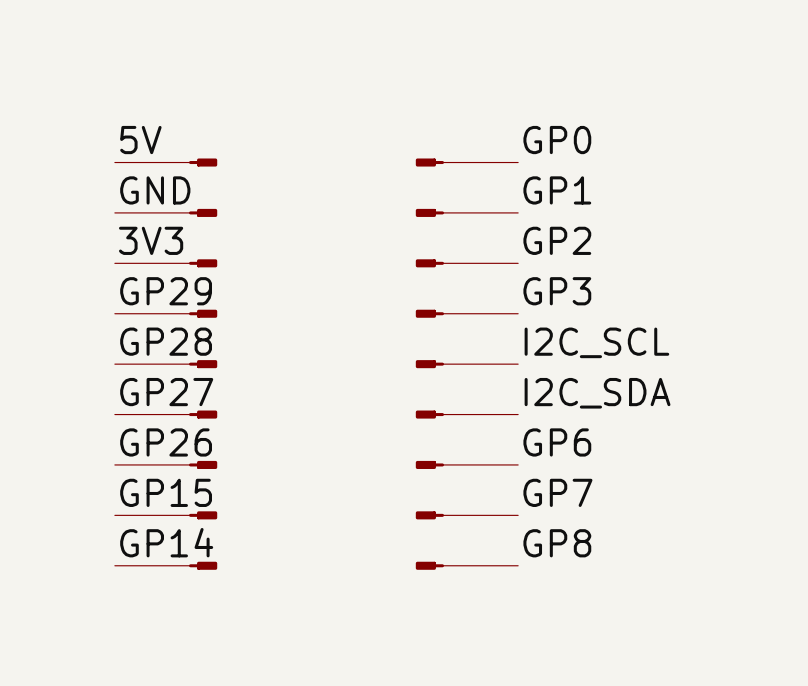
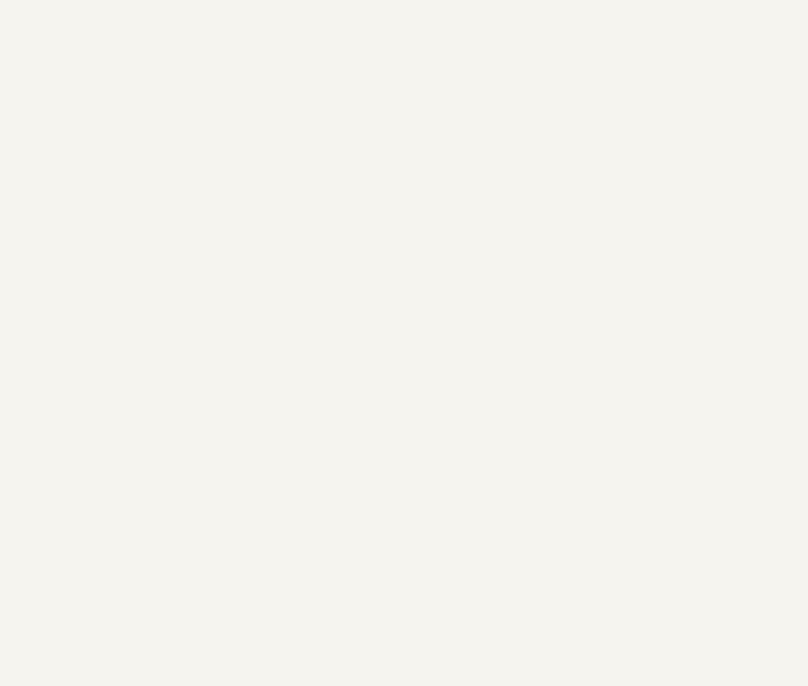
label: 5V (140, 140) -> none
label: GP0 (557, 140) -> none
label: GND (155, 190) -> none
label: GP1 (557, 190) -> none
label: 3V3 (151, 240) -> none
label: GP2 (557, 240) -> none
label: GP29 (166, 291) -> none
label: GP3 (557, 291) -> none
label: GP28 (166, 341) -> none
label: I2C_SCL (596, 342) -> none
part: (166, 364) -> none
part: (466, 364) -> none
label: GP27 (166, 392) -> none
label: I2C_SDA (597, 393) -> none
label: GP26 (166, 442) -> none
label: GP6 (557, 442) -> none
label: GP15 (166, 492) -> none
label: GP7 (557, 492) -> none
label: GP14 (166, 542) -> none
label: GP8 (557, 543) -> none

